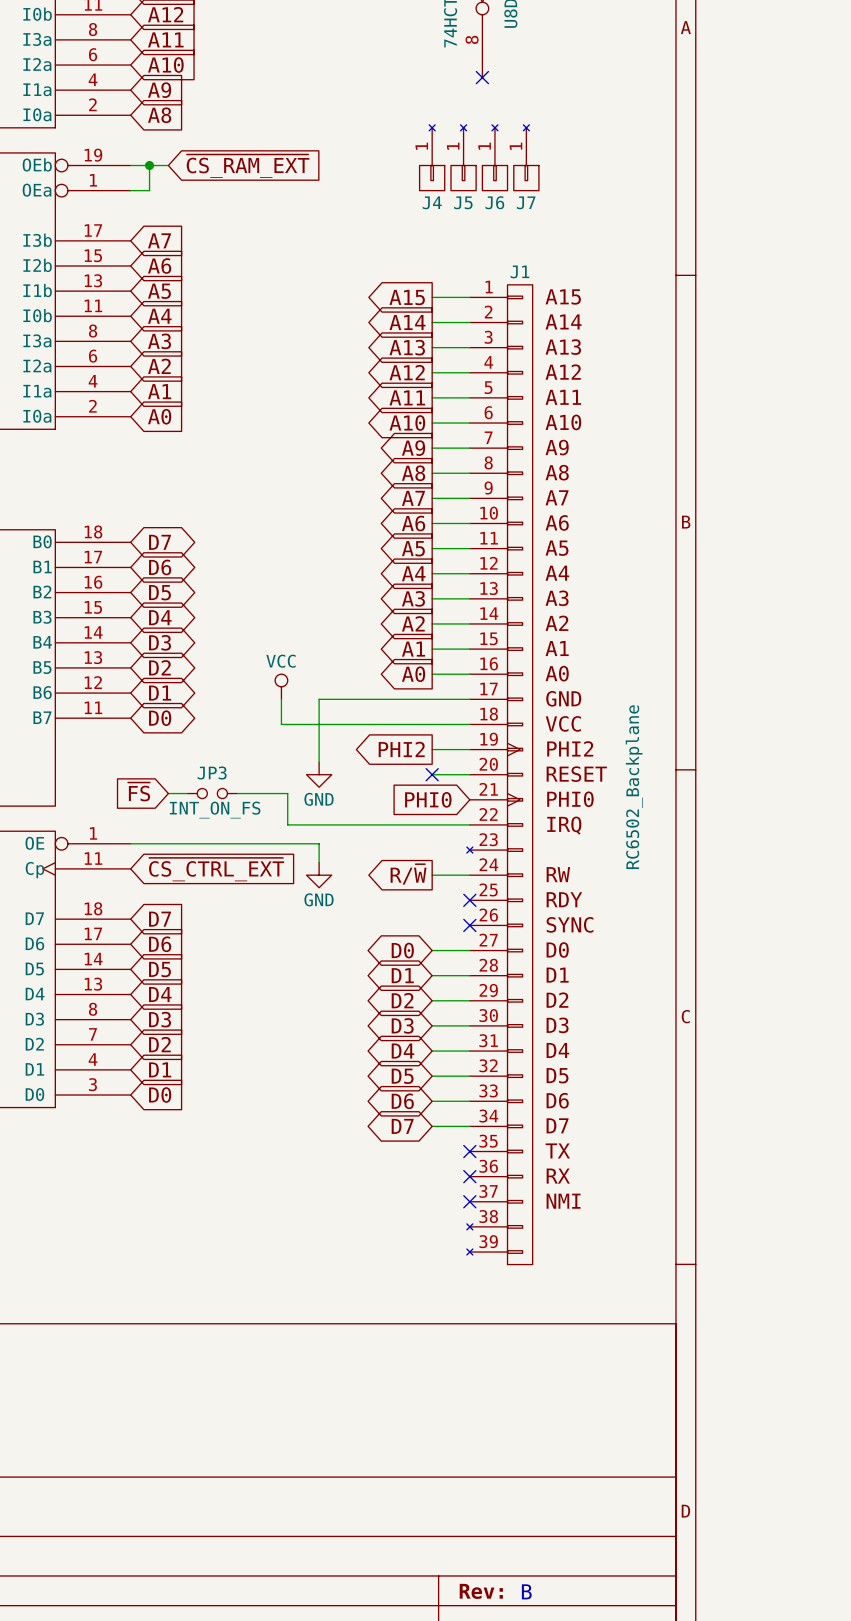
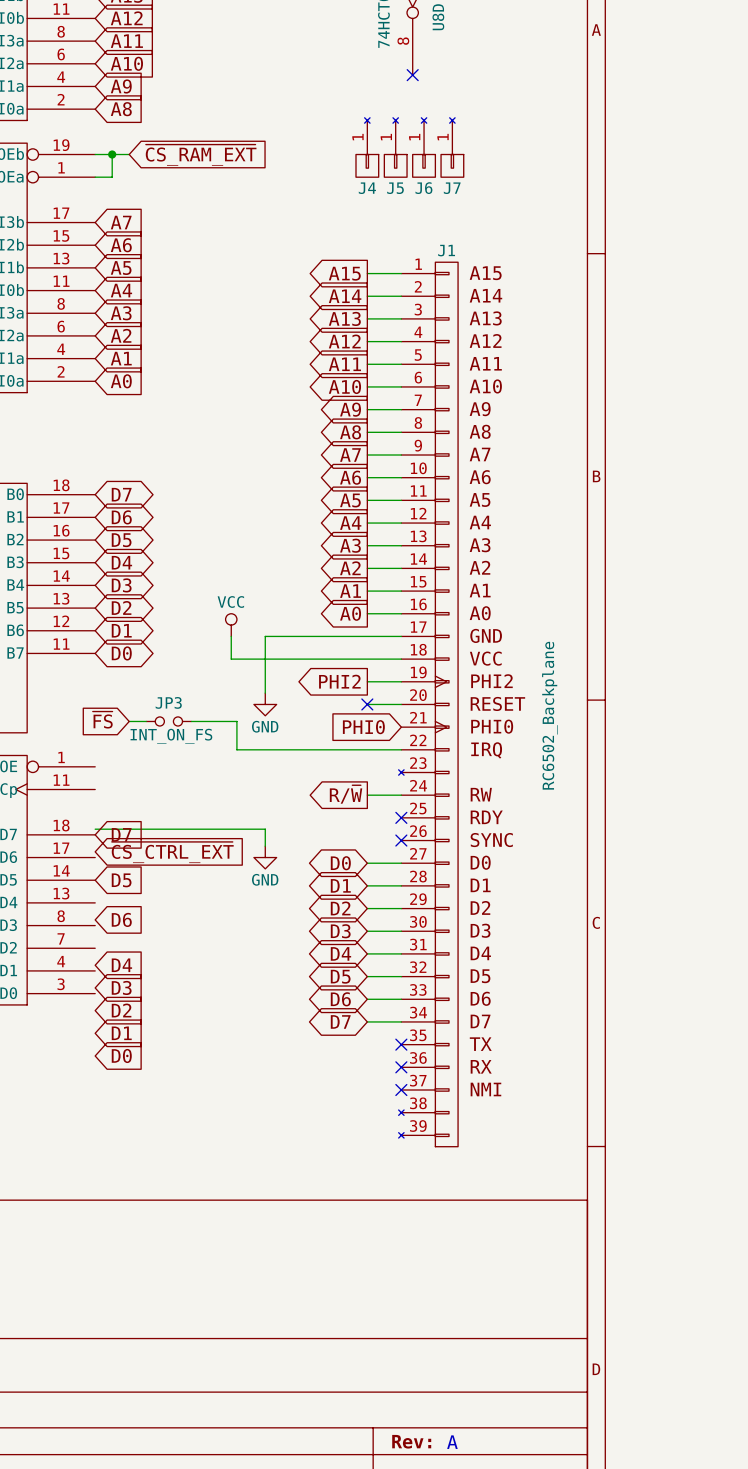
wire: (130, 843) (319, 843) (319, 862) -> (95, 829) (265, 829) (265, 846)
global label position: ~{CS_CTRL_EXT} (216, 869) -> ~{CS_CTRL_EXT} (172, 852)
power symbol position: GND (319, 875) -> GND (265, 857)
global label position: D6 (160, 944) -> D6 (121, 919)
global label position: D4 (160, 994) -> D4 (121, 965)
global label position: D3 (160, 1019) -> D3 (121, 987)
global label position: D2 (159, 1044) -> D2 (121, 1010)
global label position: D1 (160, 1069) -> D1 (121, 1033)
global label position: D0 (160, 1095) -> D0 (121, 1055)
text: B (526, 1591) -> A (452, 1442)

